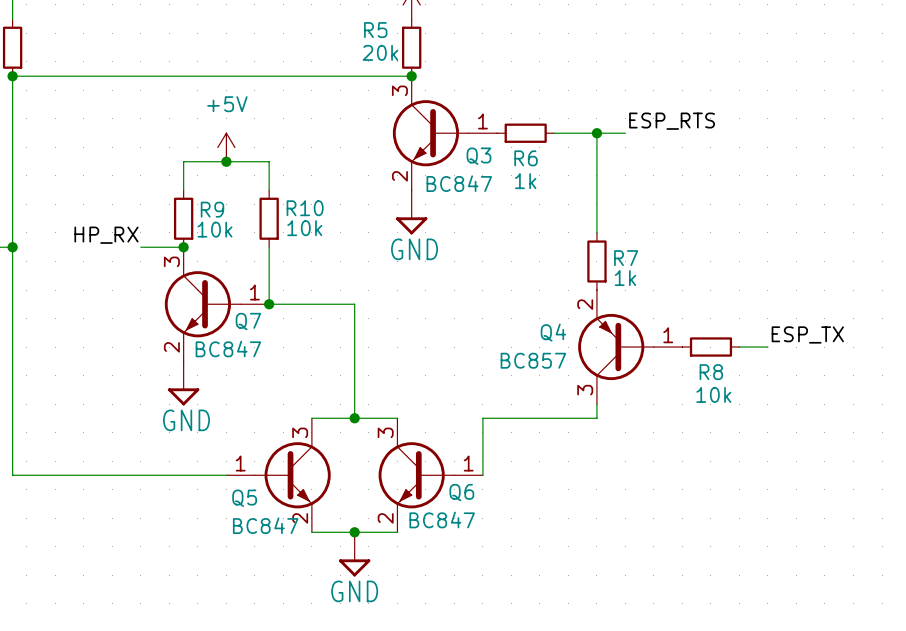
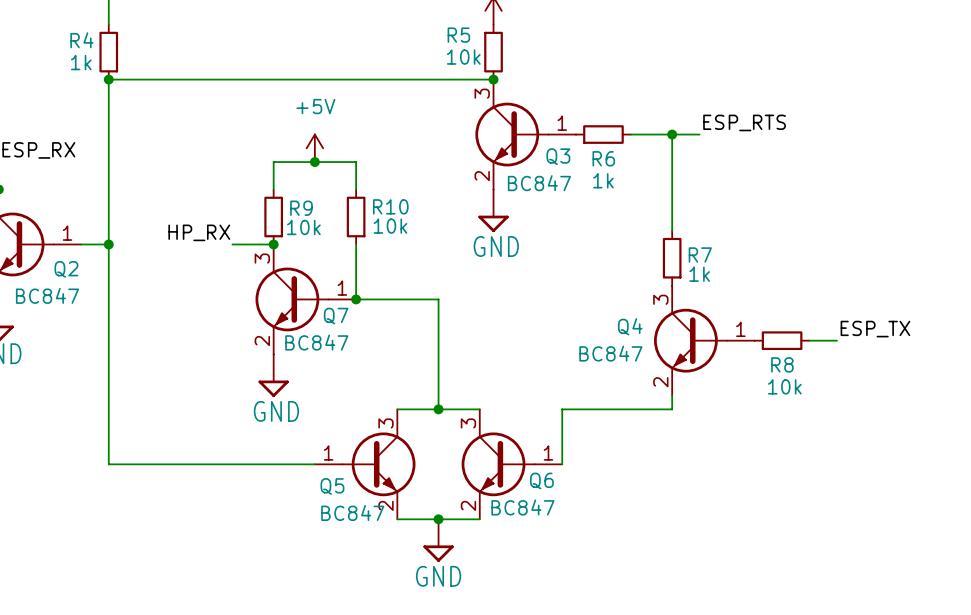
R5 value: 20k (380, 52) -> 10k (463, 57)
Q4 symbol: [578, 290, 683, 405] -> [654, 285, 755, 396]
Q4 value: BC857 (533, 360) -> BC847 (610, 353)

